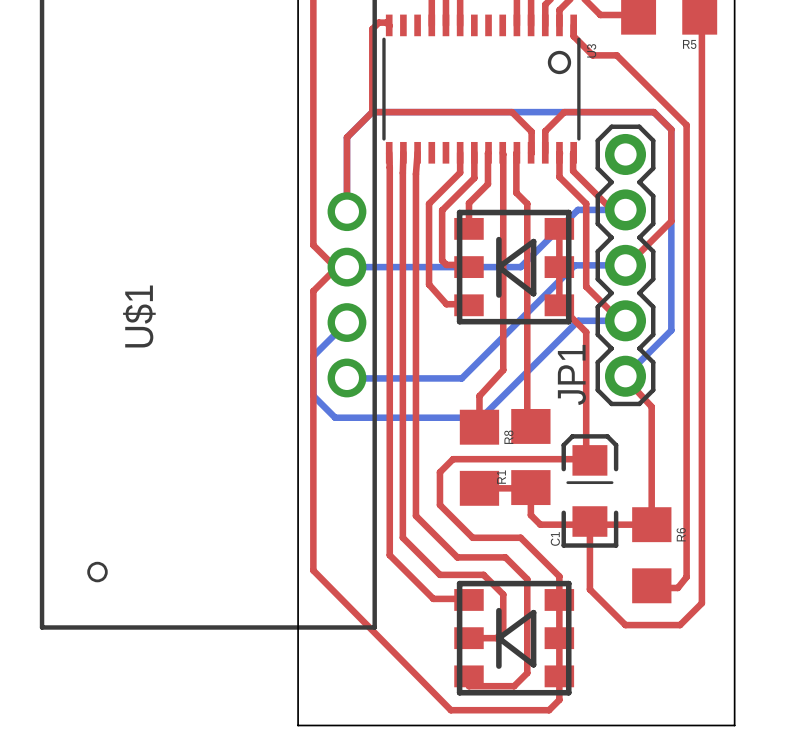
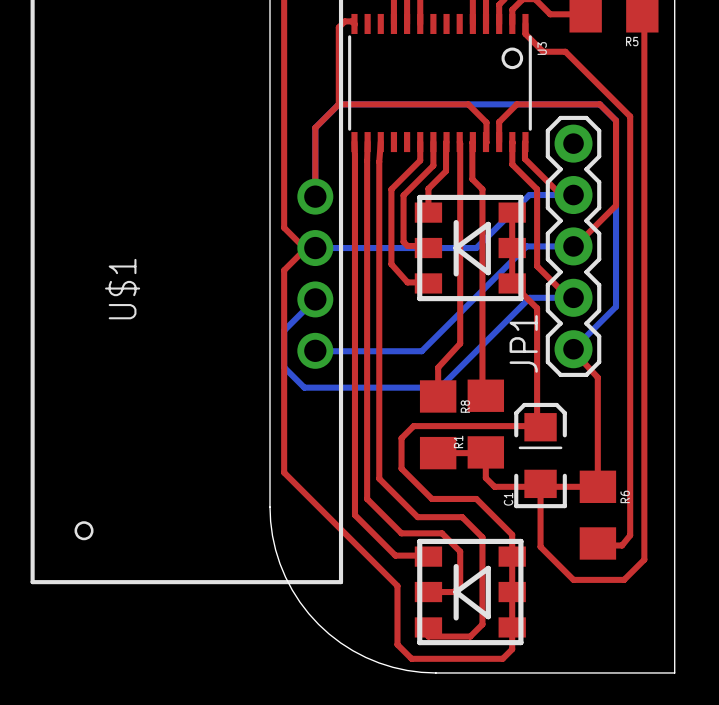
top track: (313, 509) (313, 570) (450, 710) -> (284, 472) (397, 585) (397, 644) (411, 658)
board edge: (298, 546) (298, 725) (477, 725) -> (269, 507) (272, 535) (280, 563) (292, 590) (318, 624) (352, 650) (379, 662) (407, 670) (435, 672)

